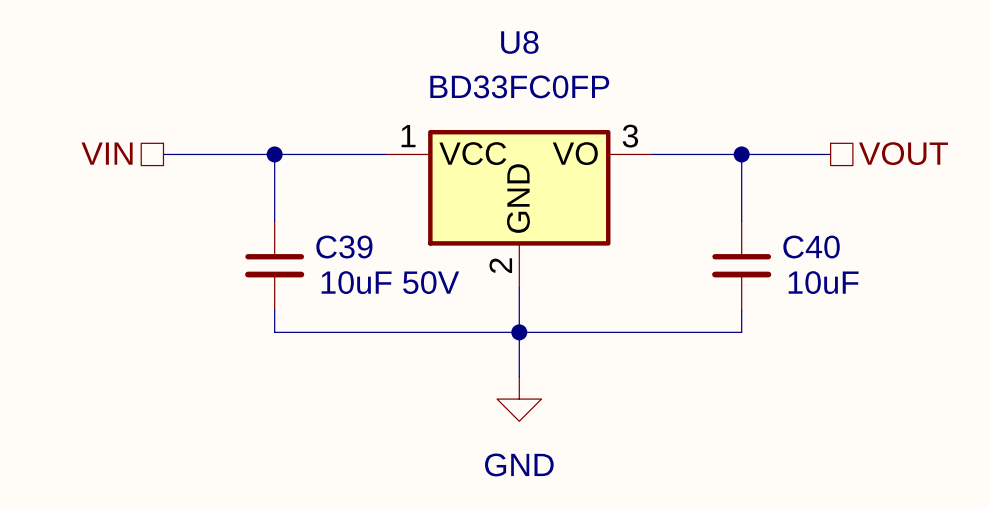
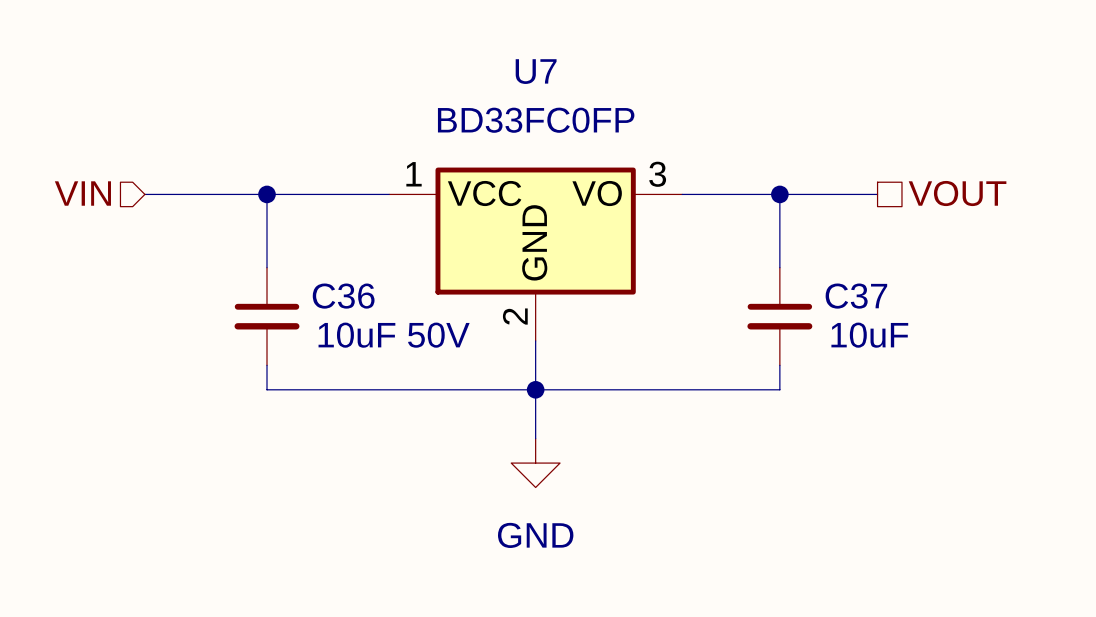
U8 name: U8 (519, 42) -> U7 (536, 71)
hierarchical label shape: passive (107, 153) -> input (82, 193)
C39 name: C39 (344, 247) -> C36 (343, 296)
C40 name: C40 (811, 247) -> C37 (856, 296)

